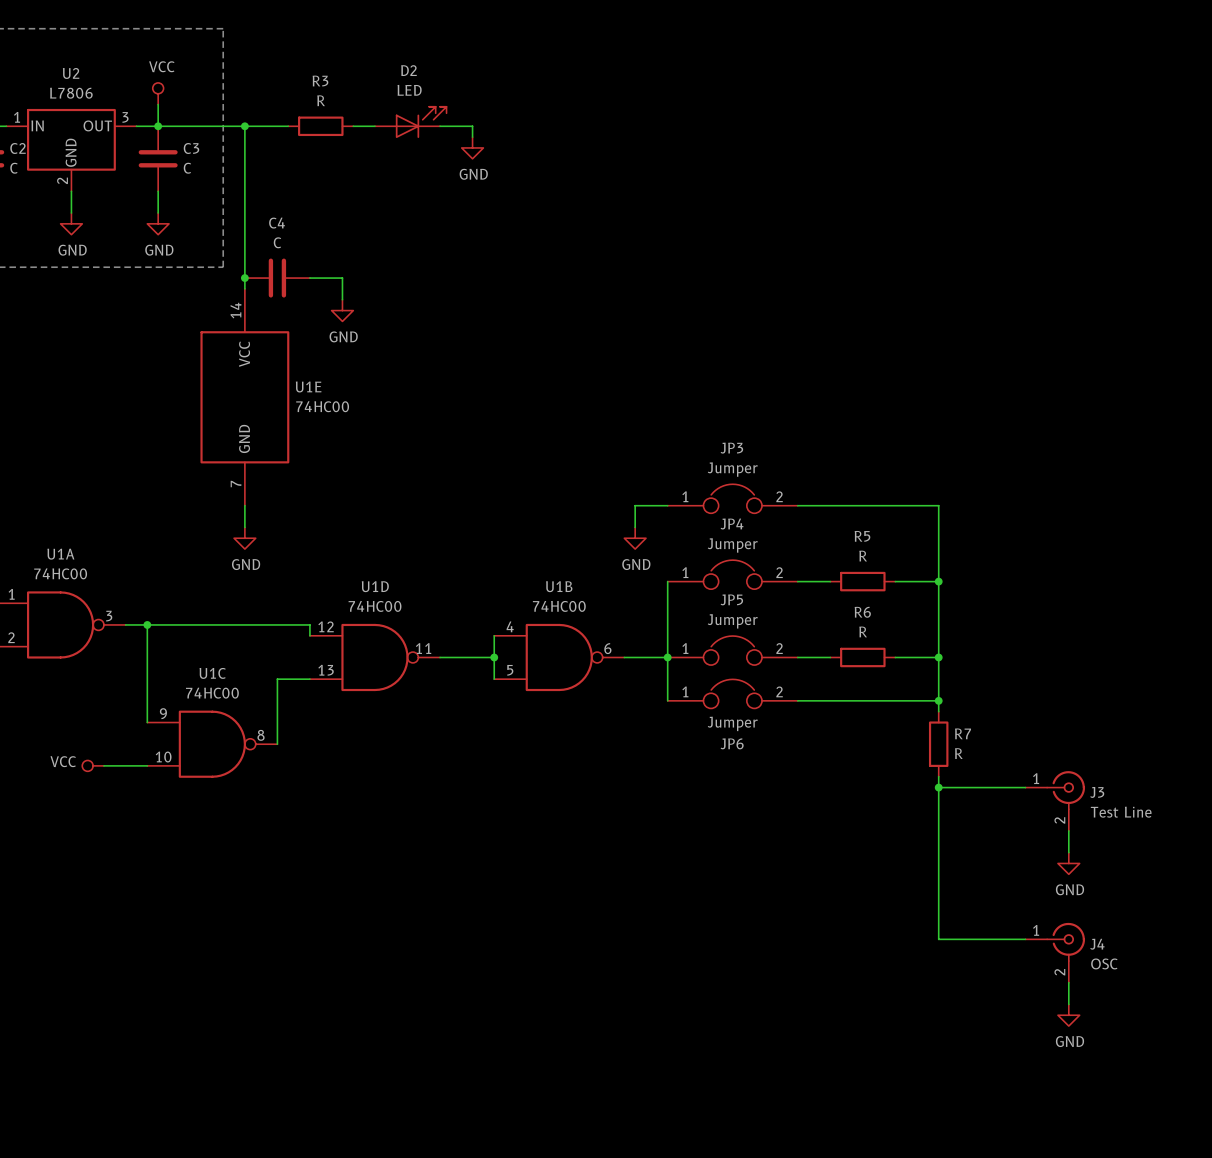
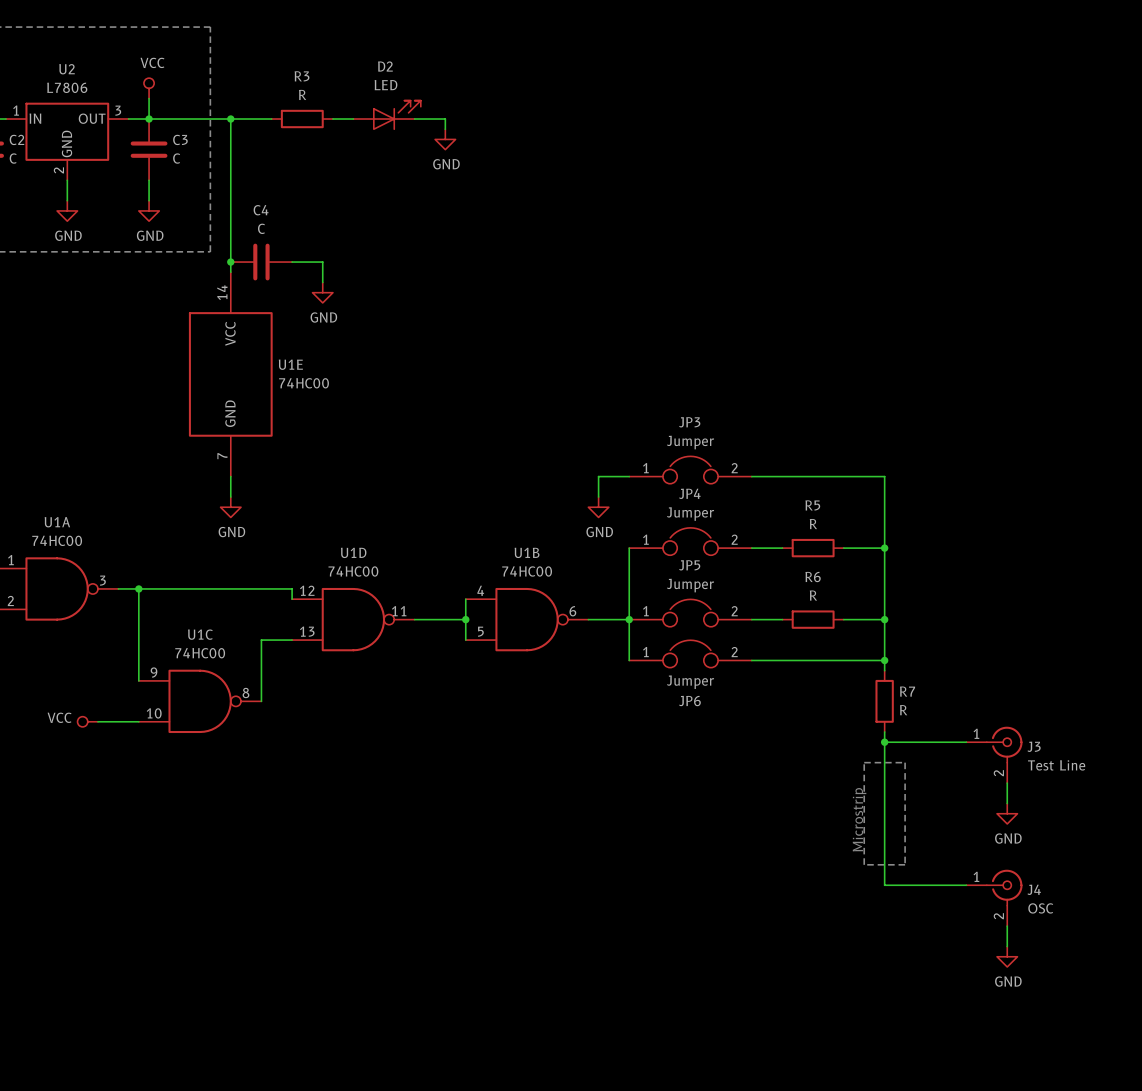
line: none -> (864, 762) (905, 762) (905, 864) (864, 864) (864, 762)
text: none -> Microstrip (859, 819)

